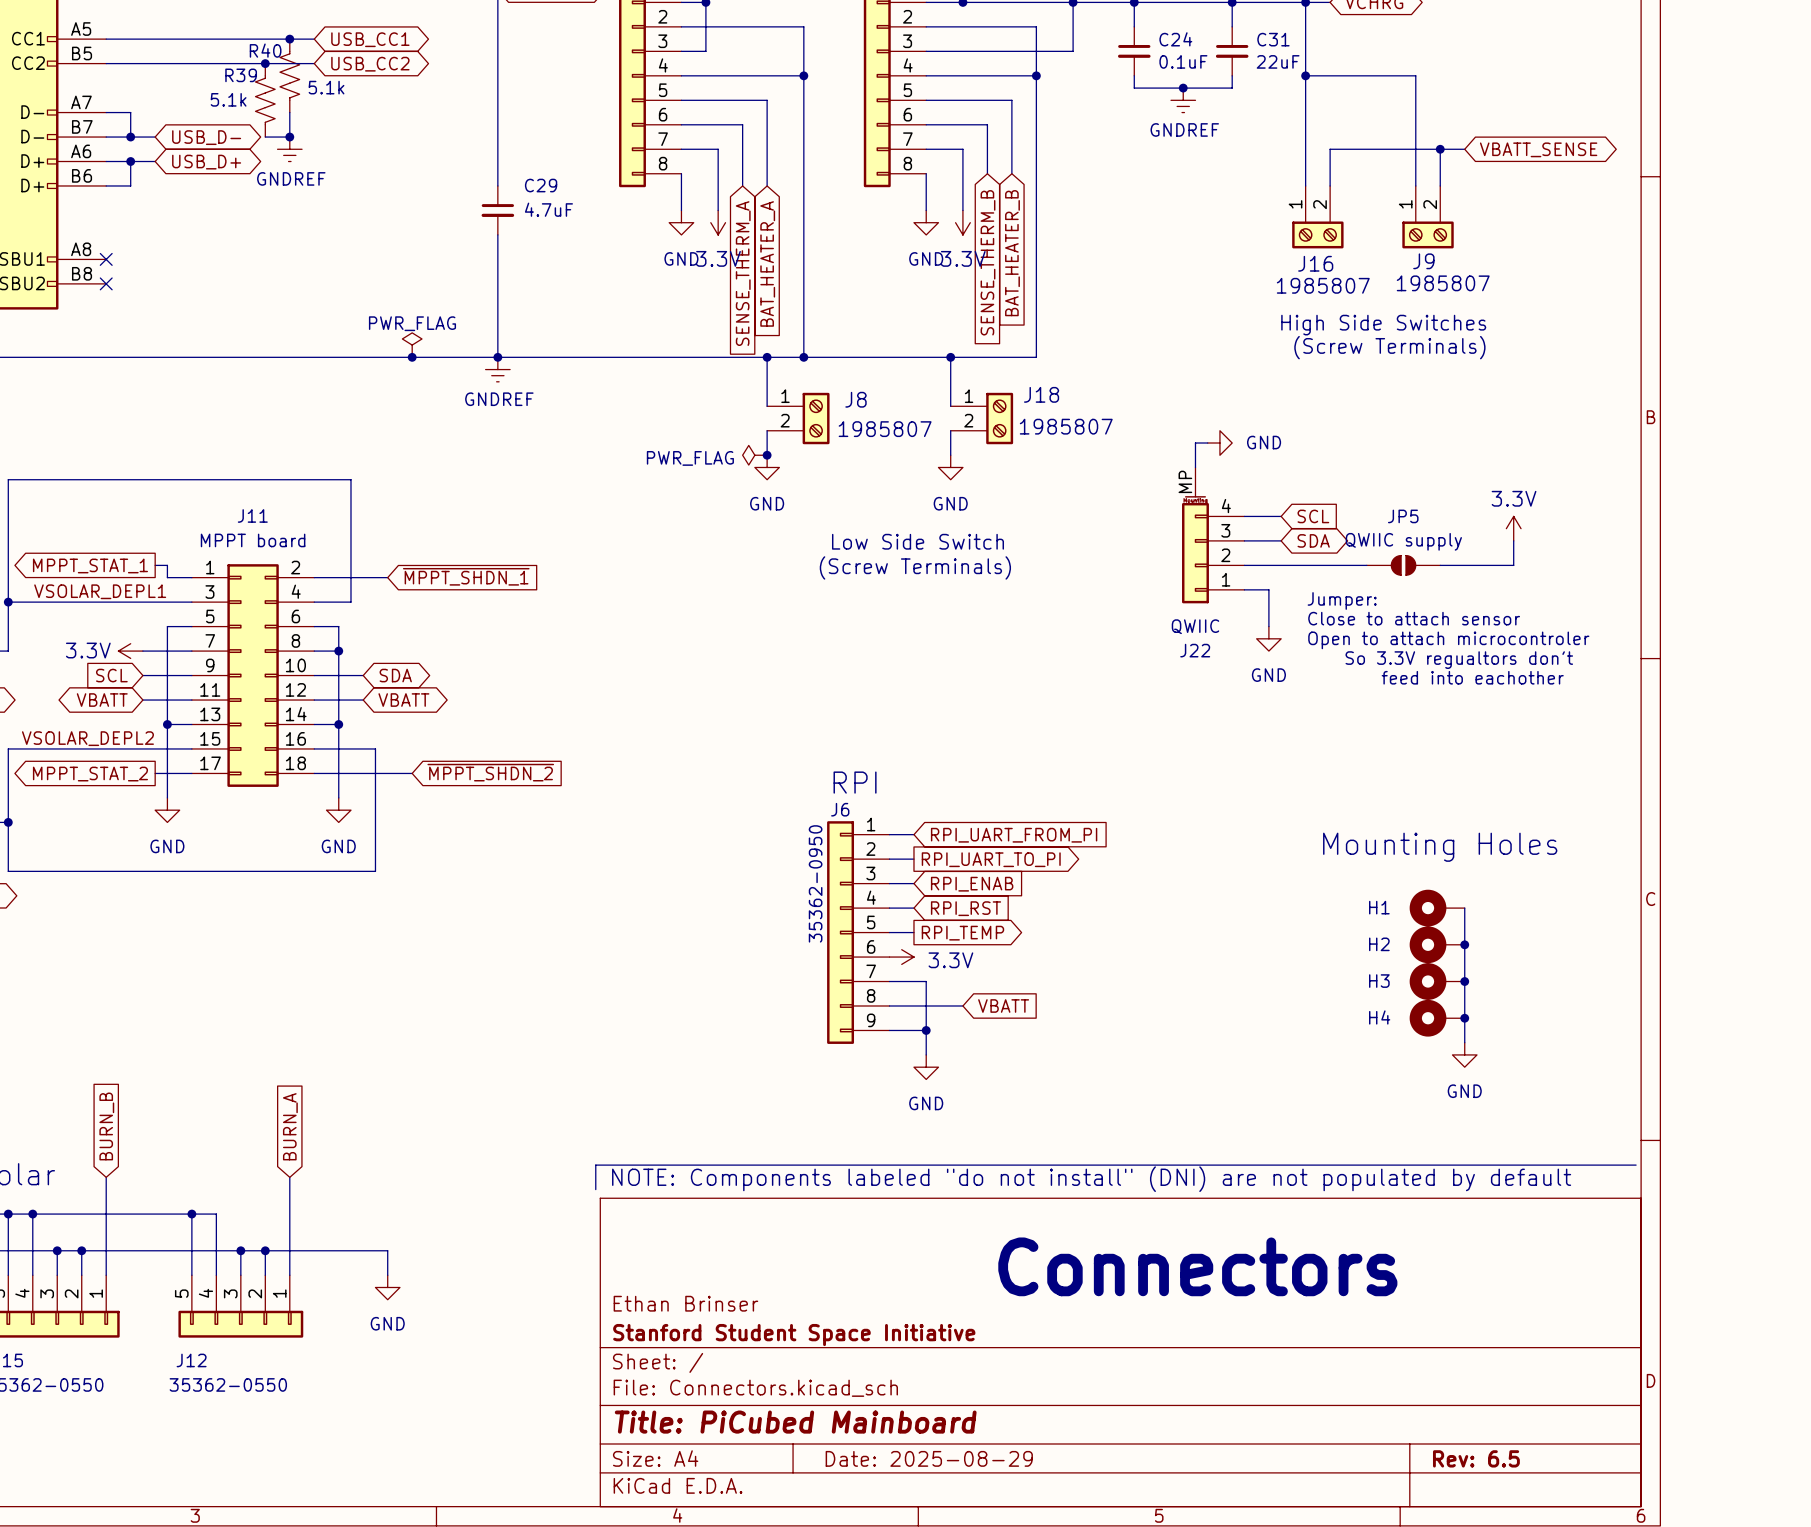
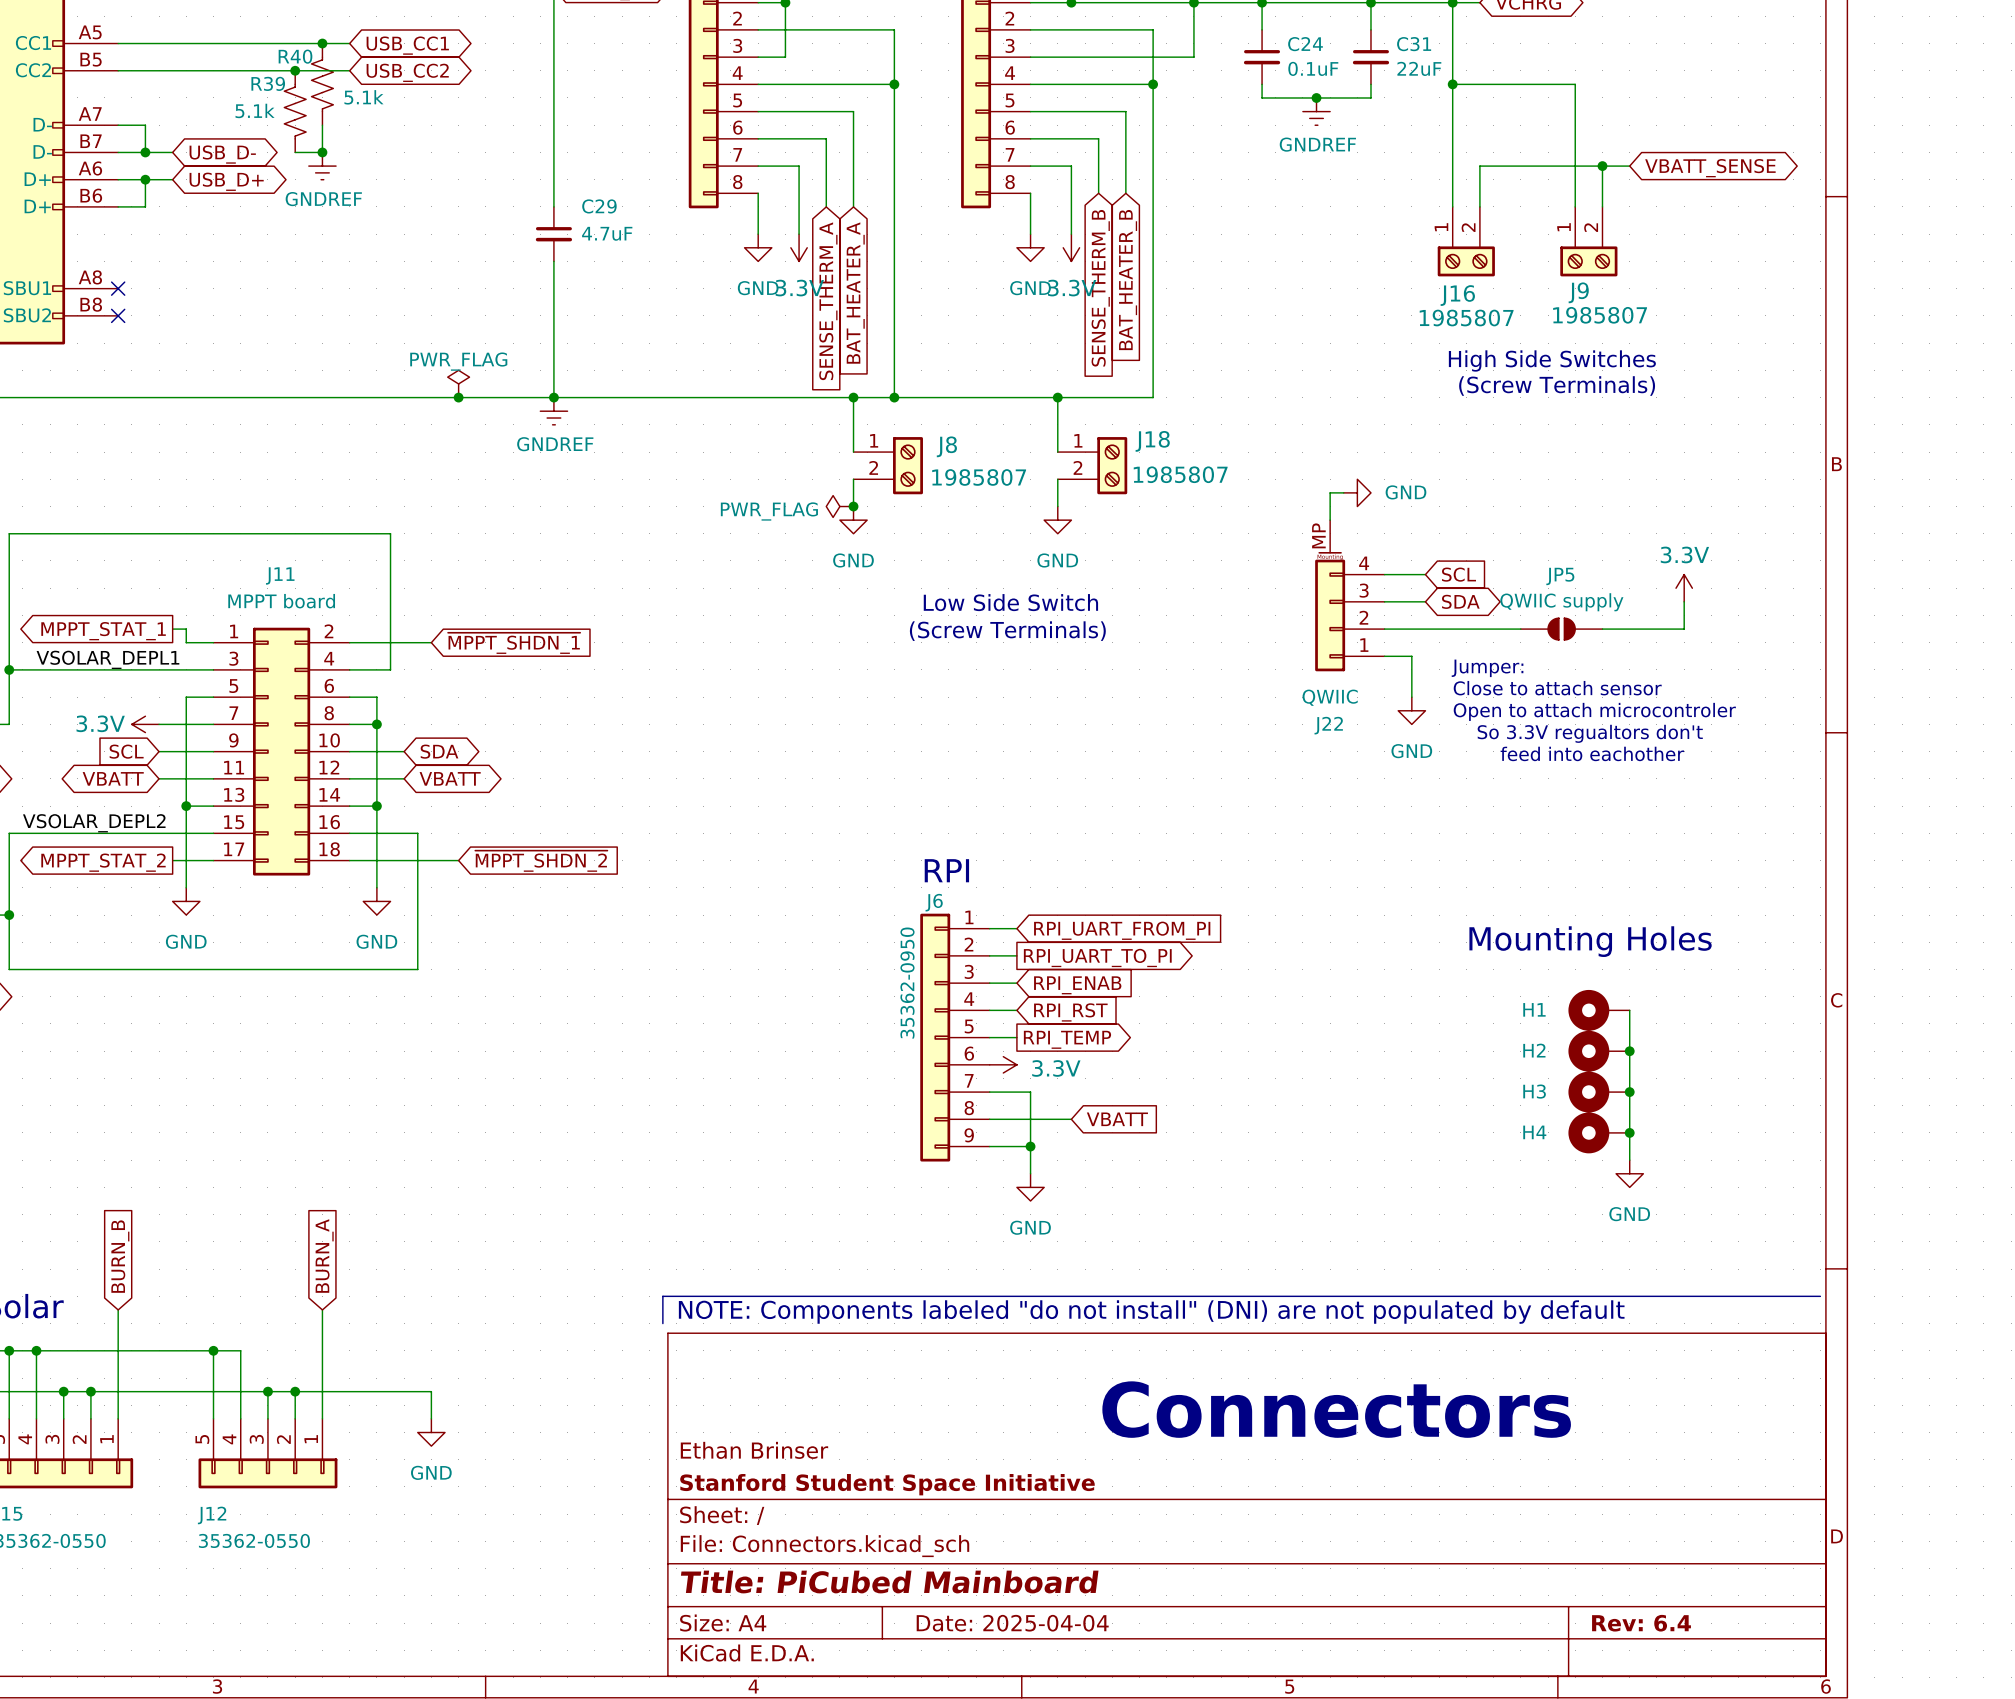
title block: Date: 2025-08-29 (929, 1458) -> Date: 2025-04-04 (1012, 1623)
title block: Rev: 6.5 (1476, 1458) -> Rev: 6.4 (1641, 1623)

